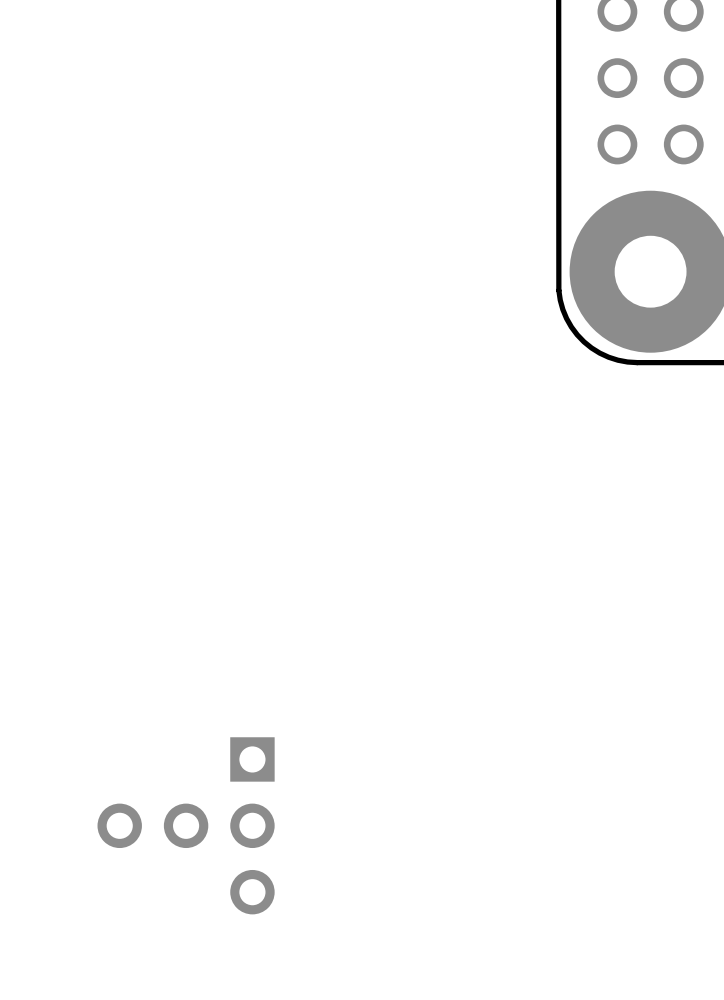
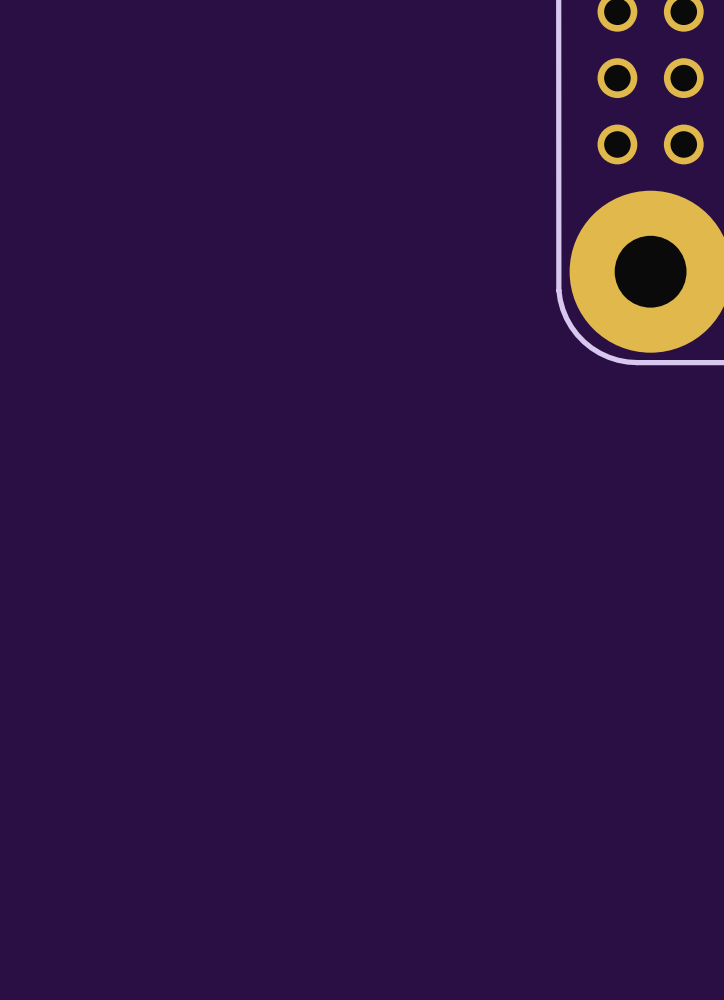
part: (186, 825) -> none

